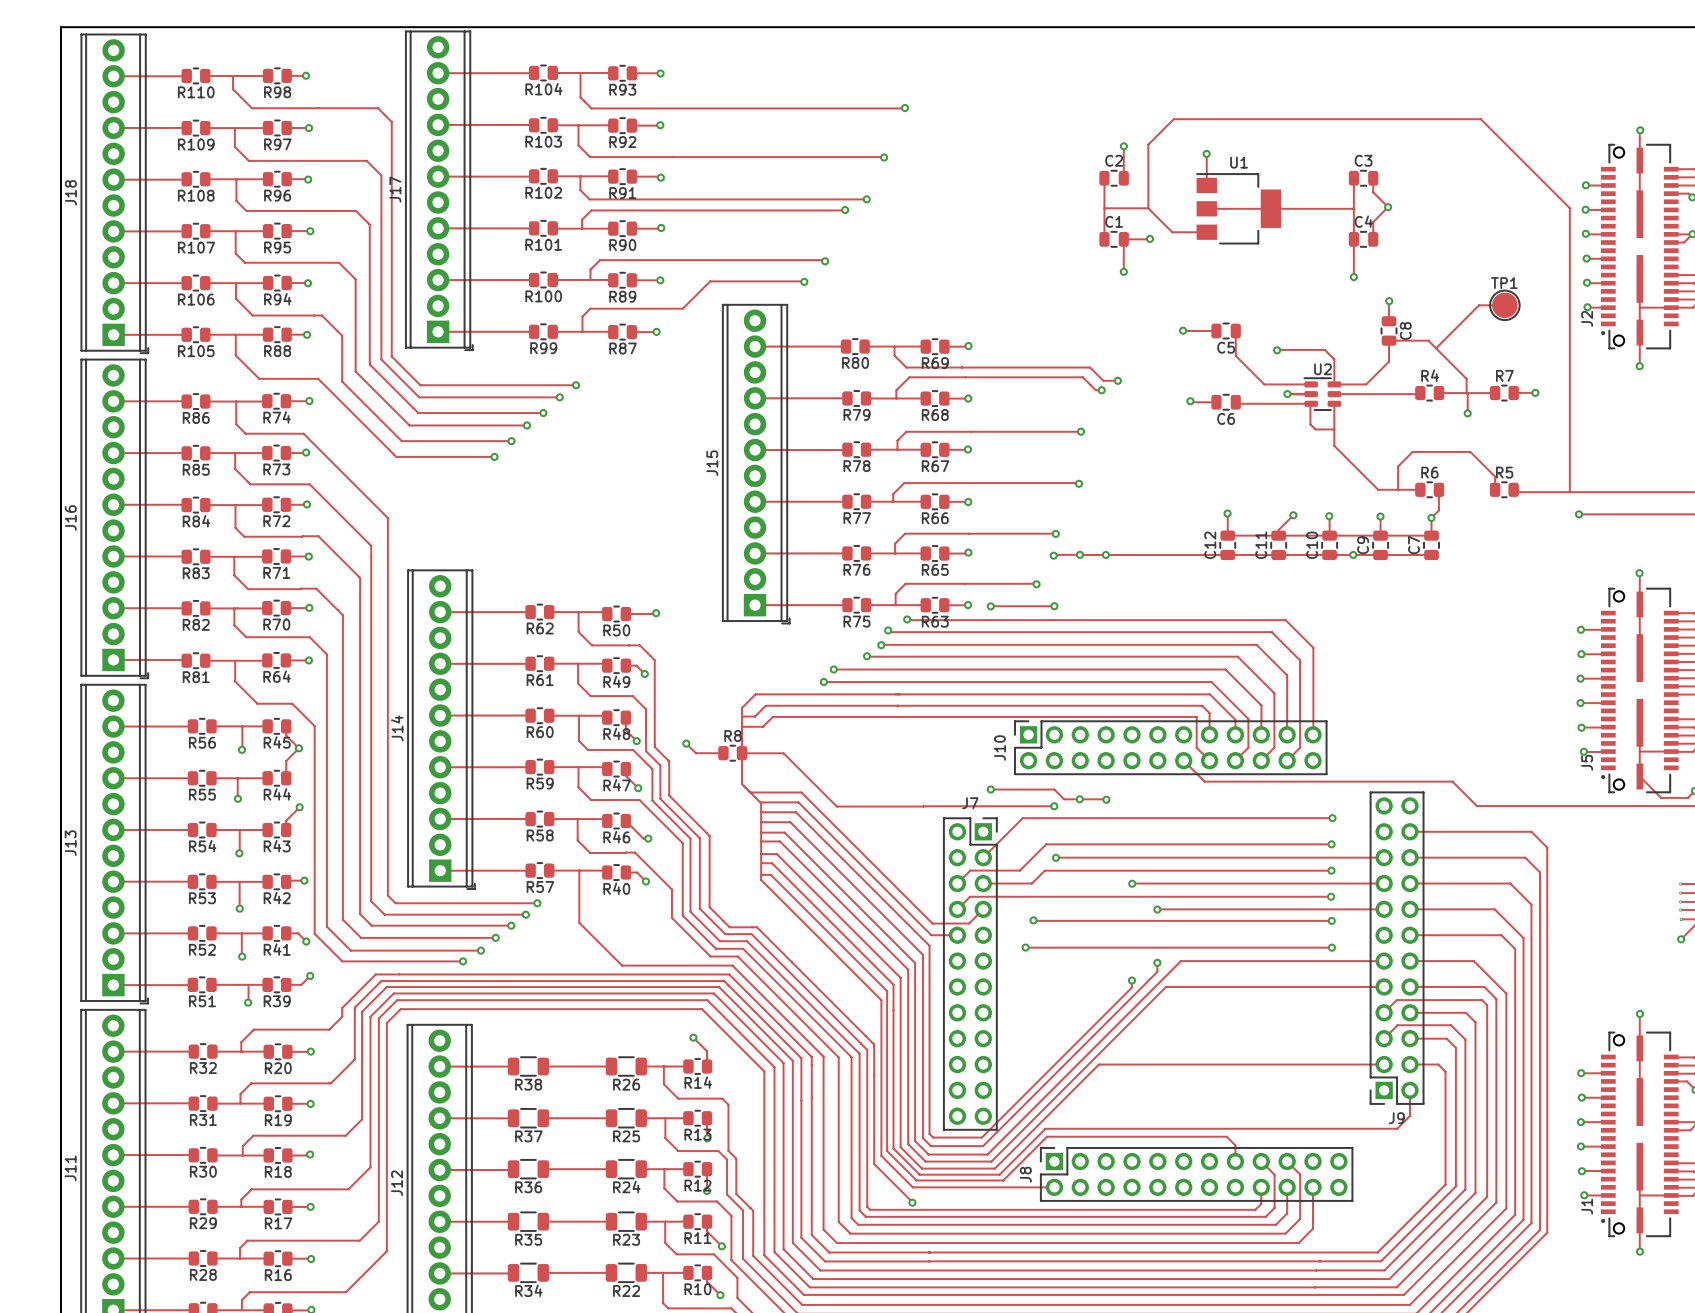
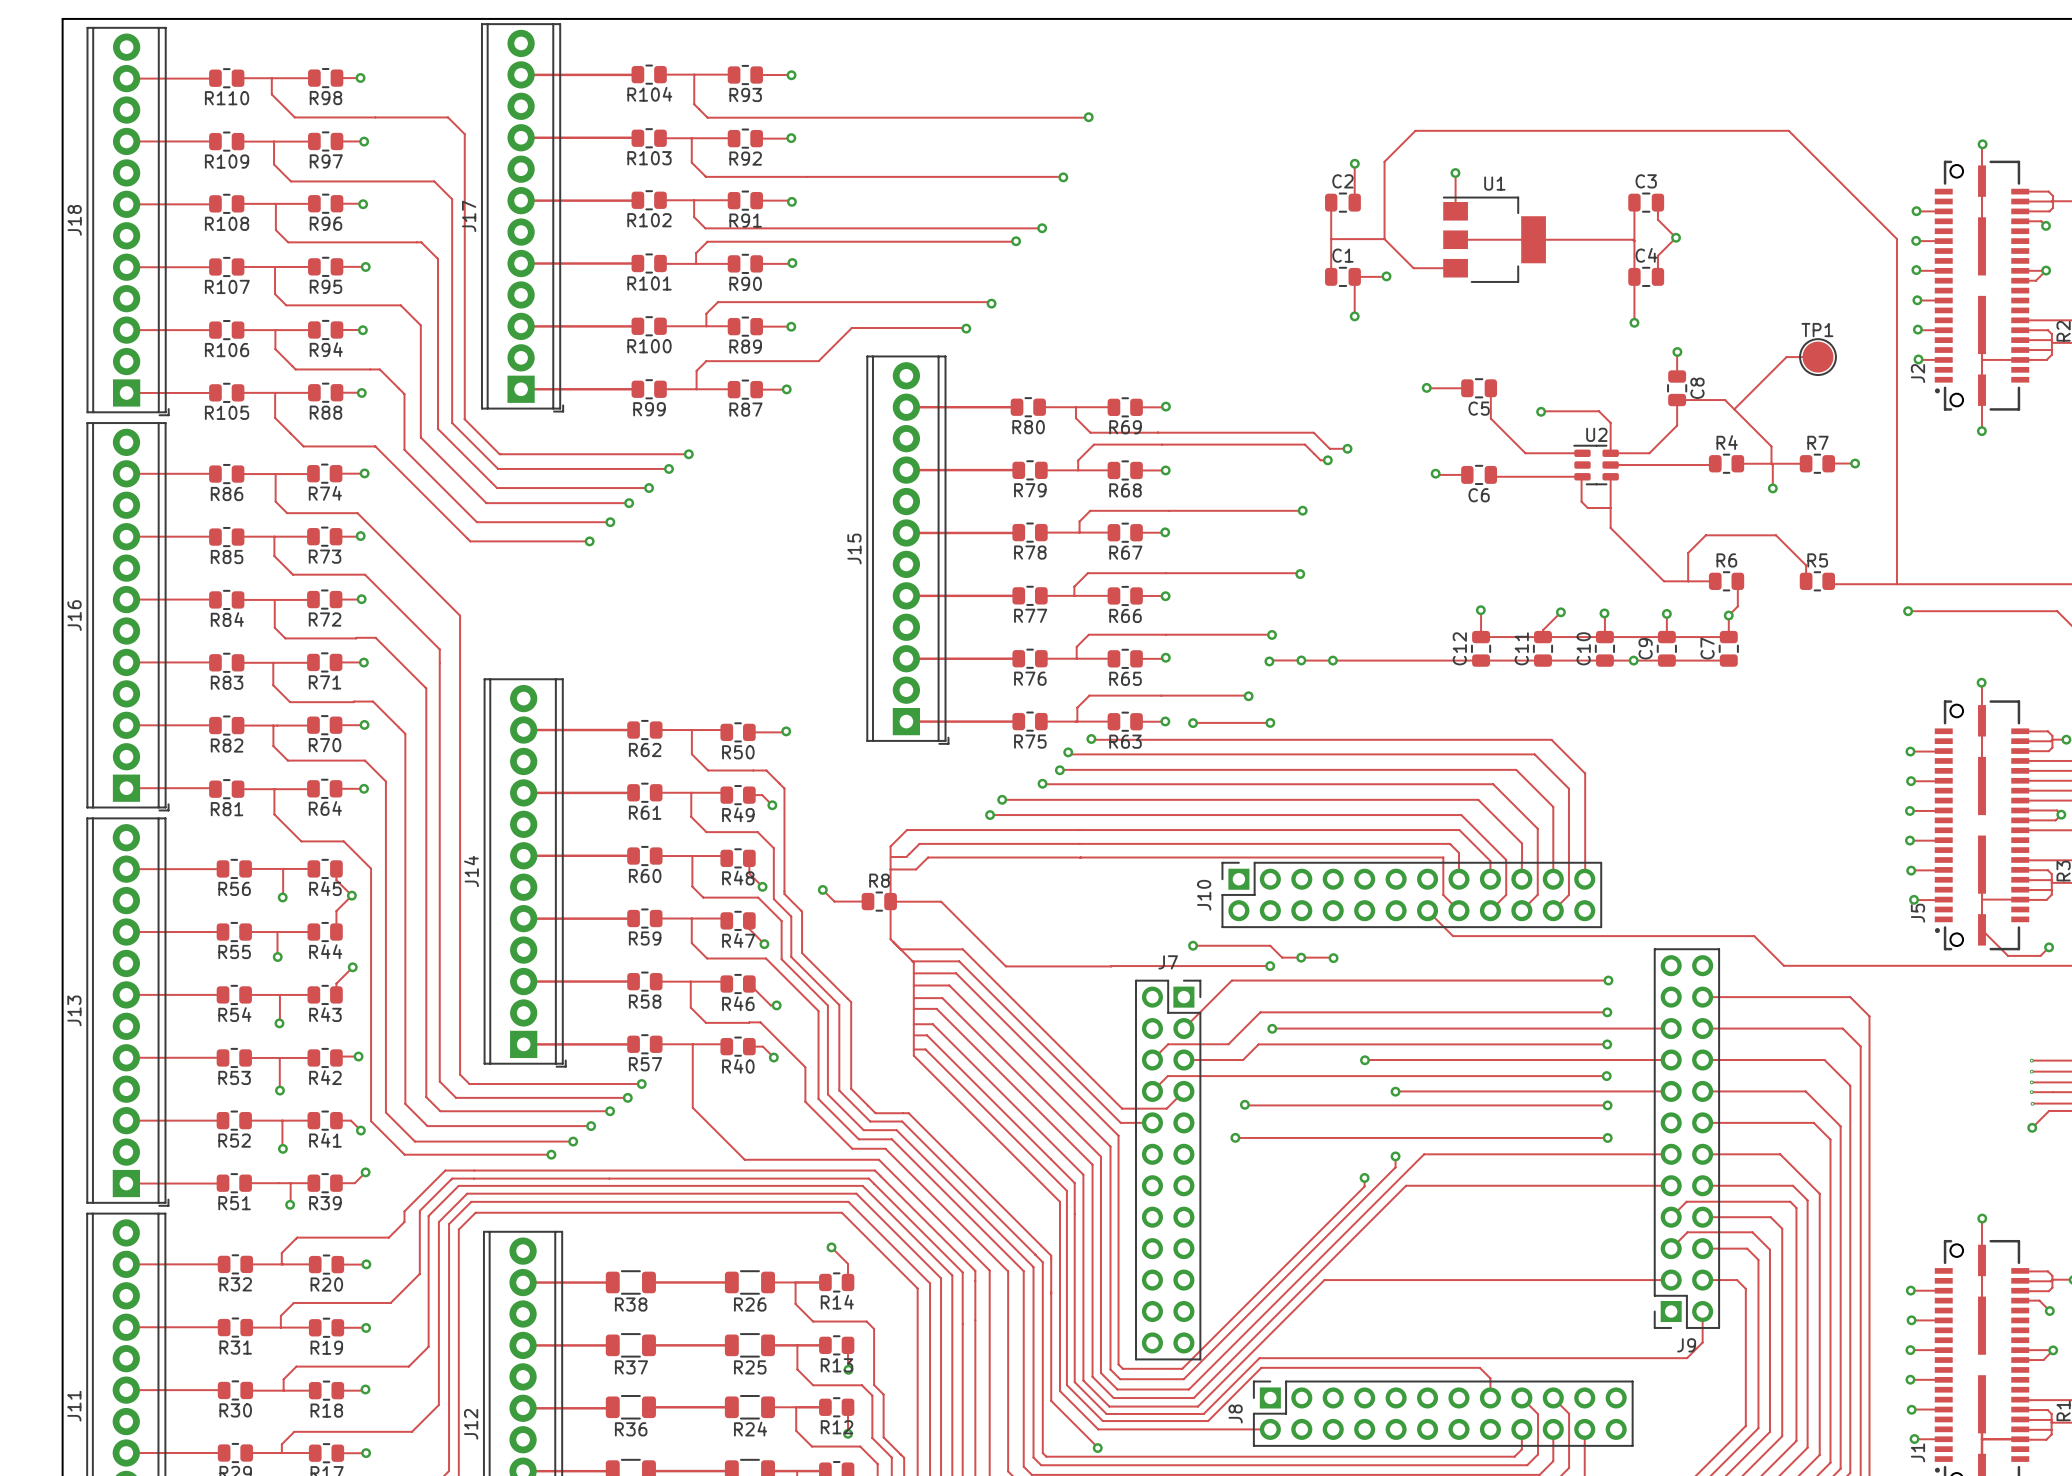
track: (1287, 394) (1311, 394) -> none
via: (1287, 394) -> none

